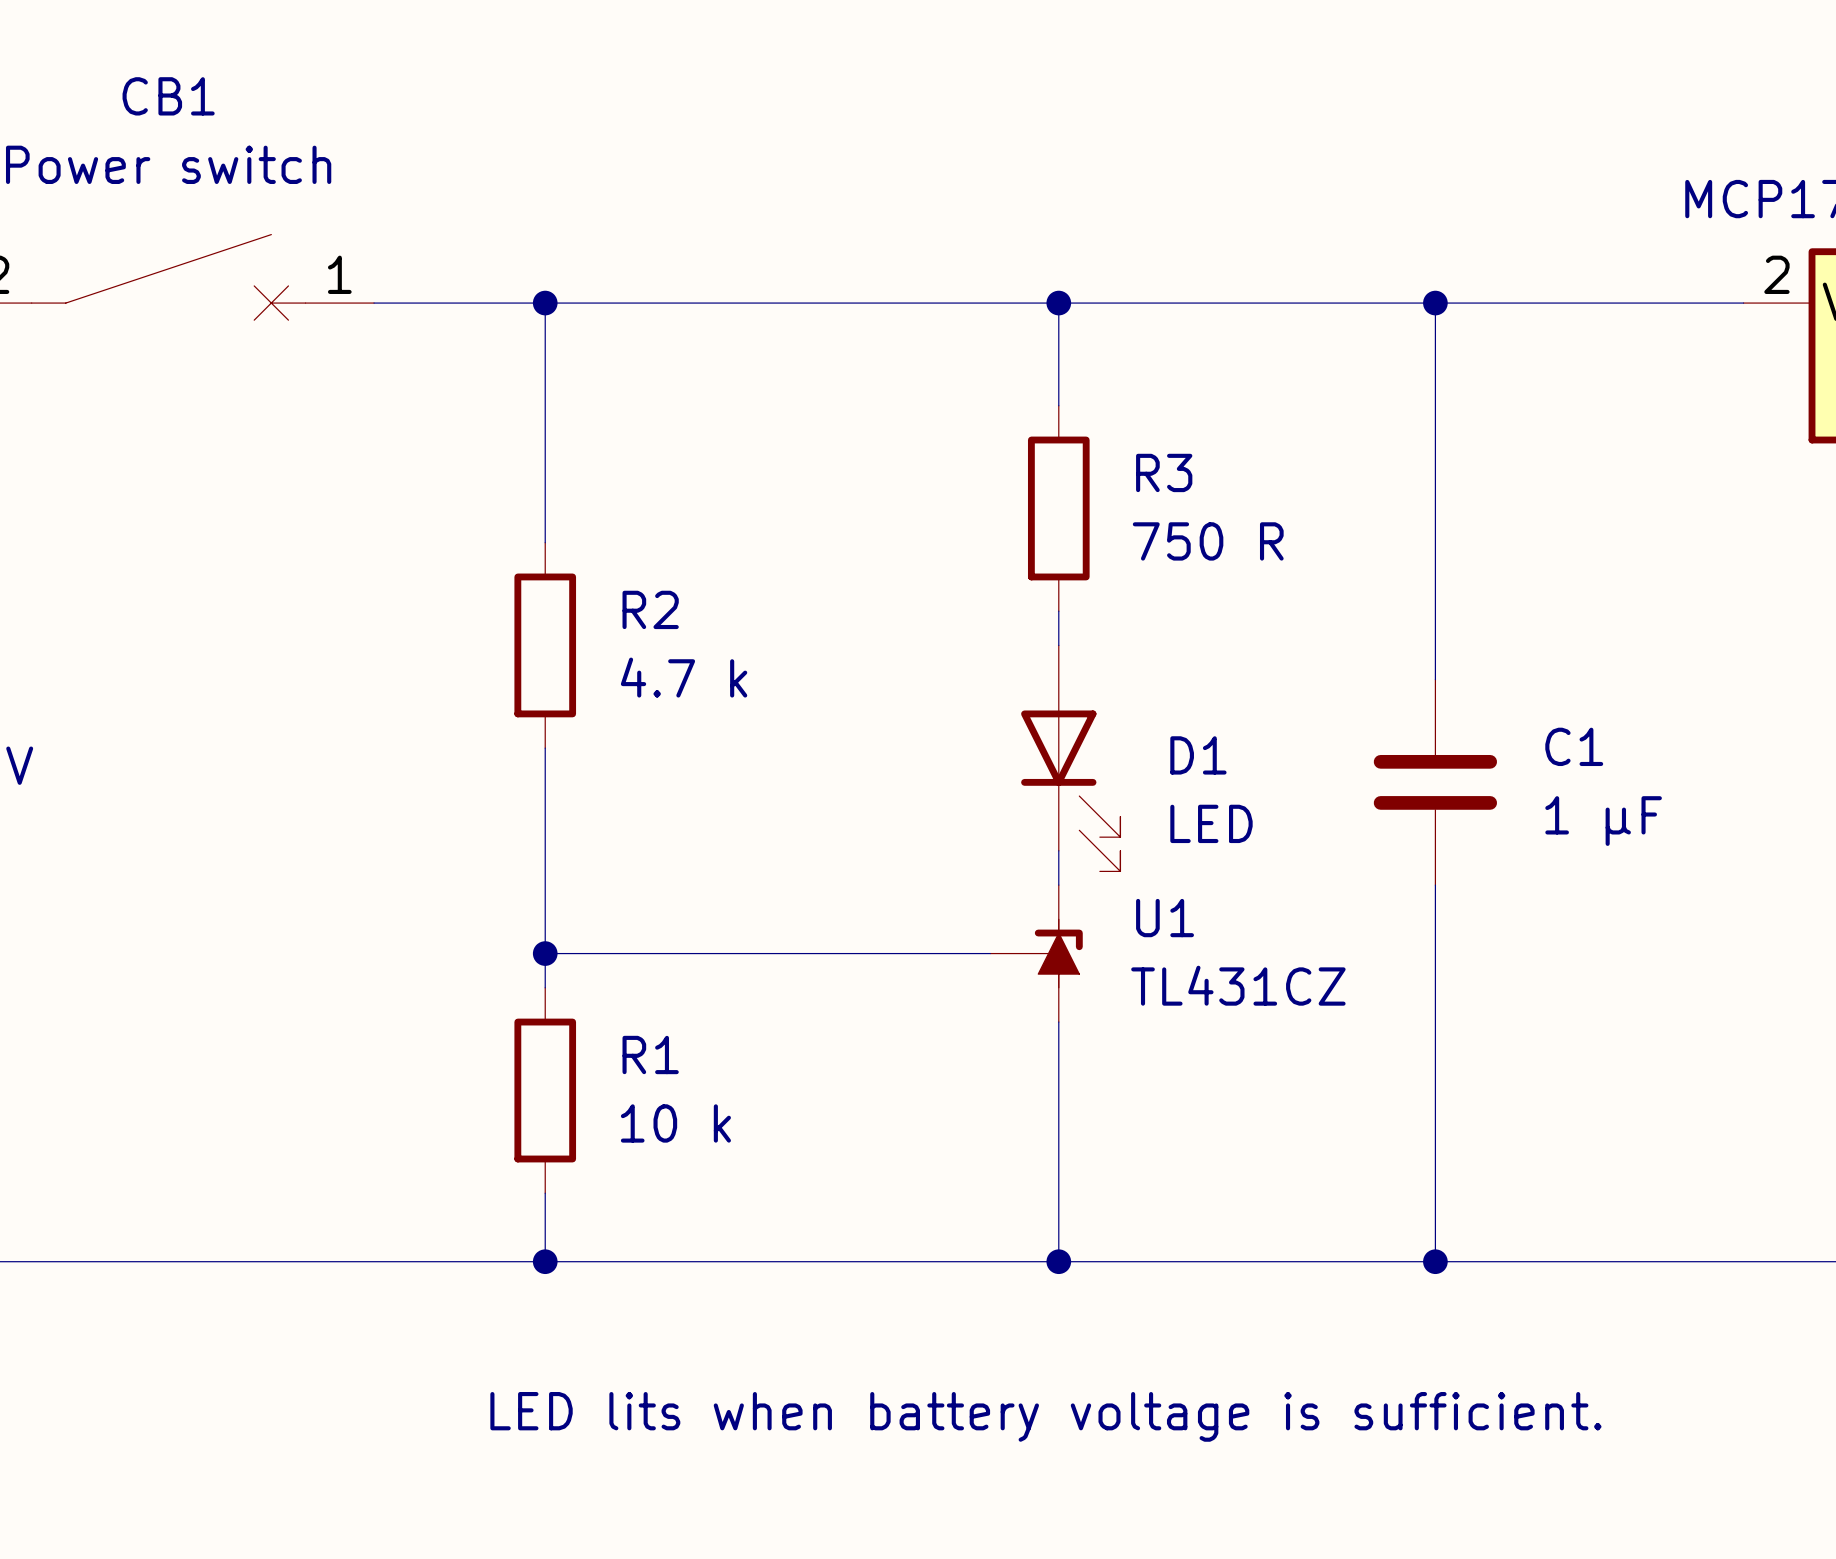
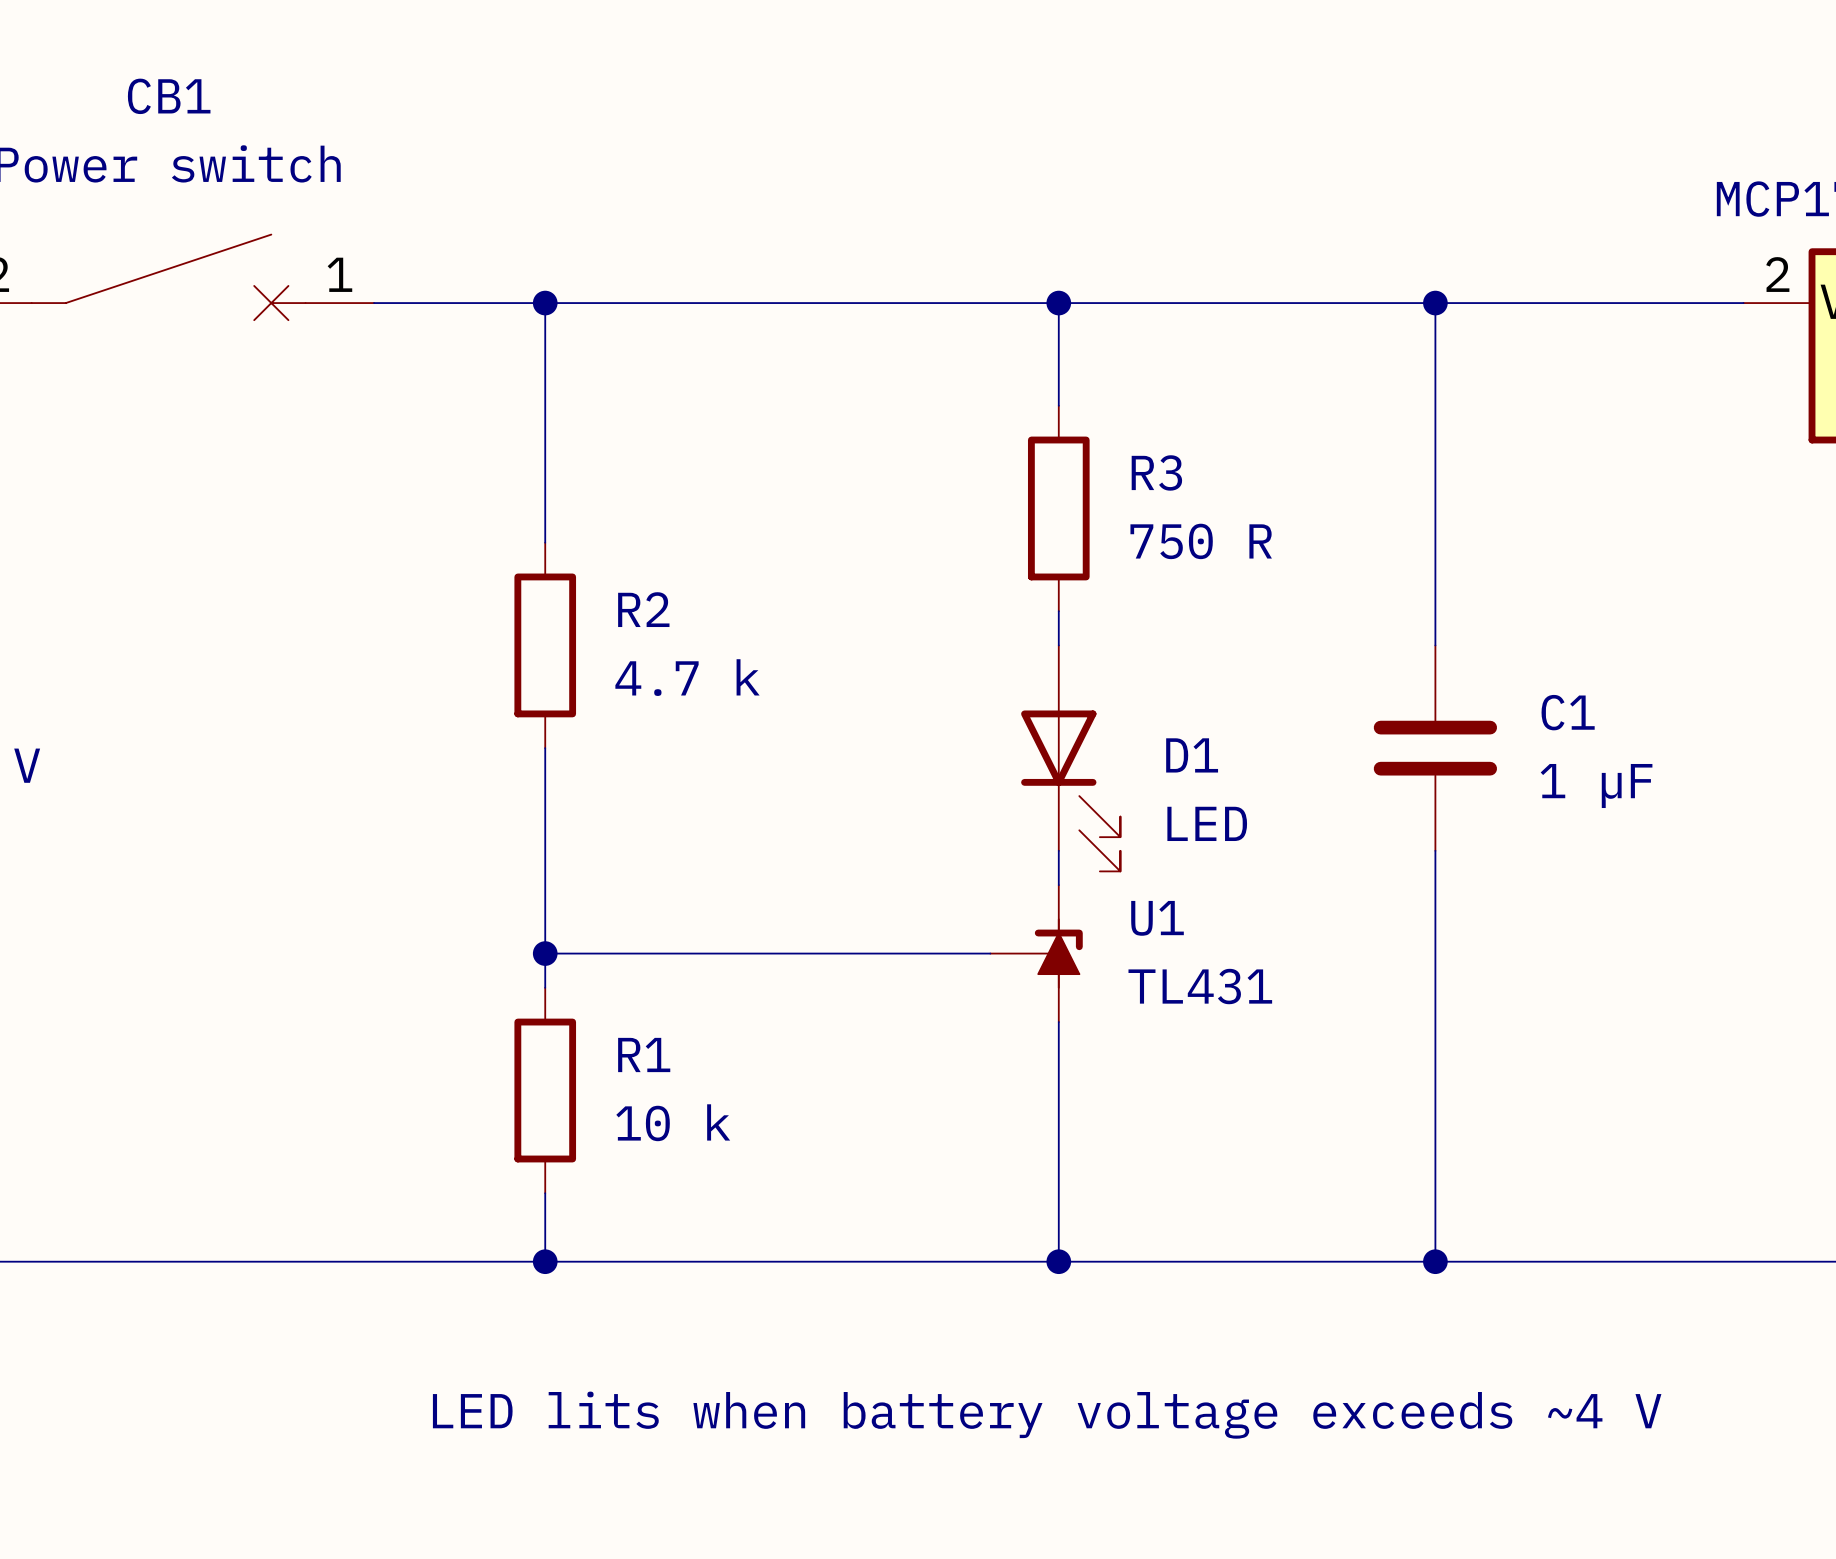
C1 position: (1435, 782) -> (1435, 748)
U1 value: TL431CZ (1238, 985) -> TL431 (1200, 986)
text: LED lits when battery voltage is sufficient. (1045, 1416) -> LED lits when battery voltage exceeds ~4 V (1047, 1415)

